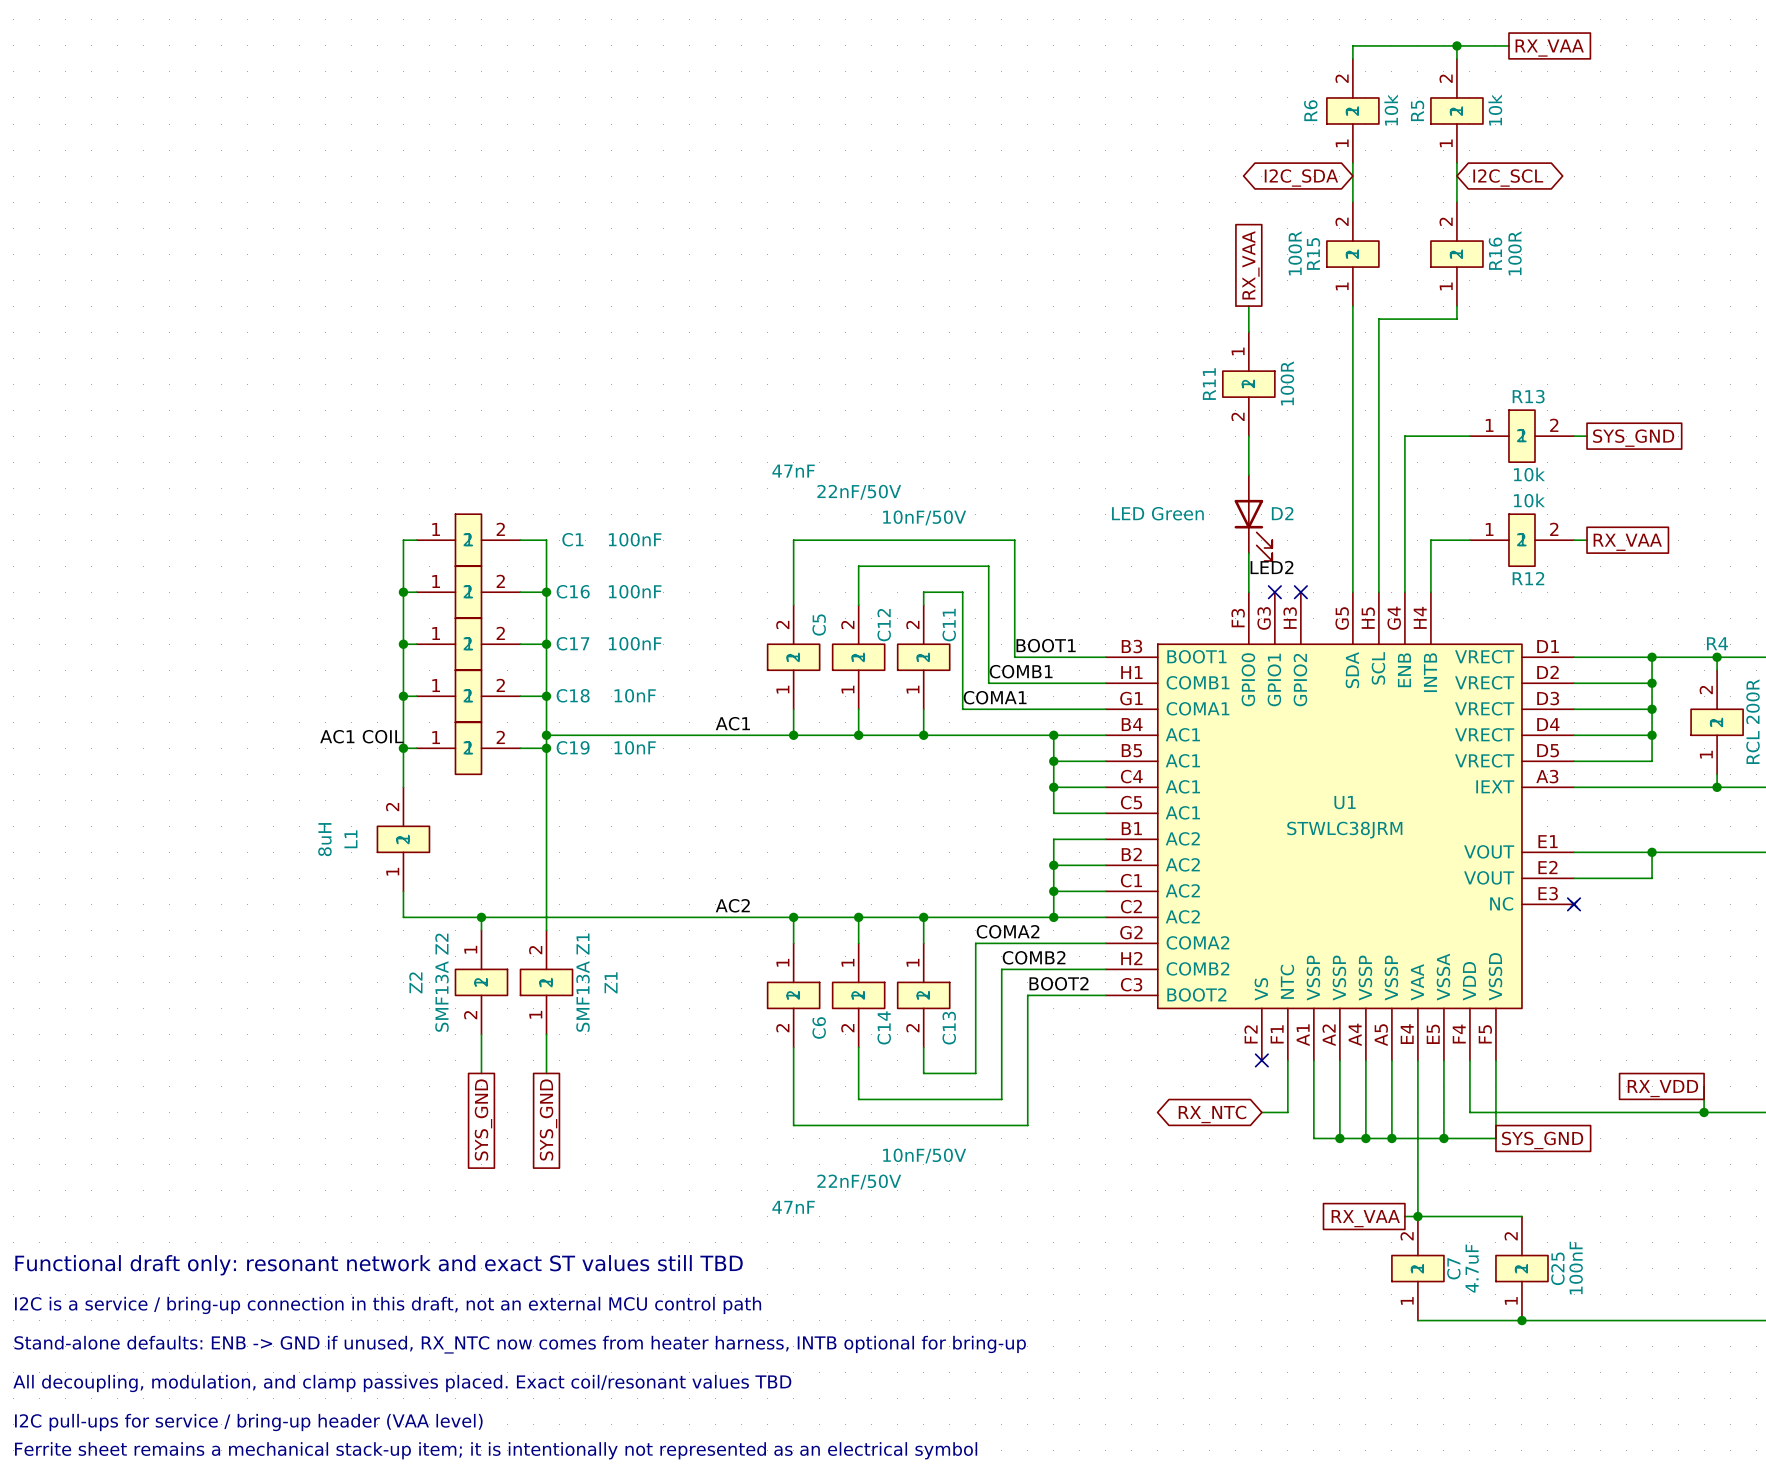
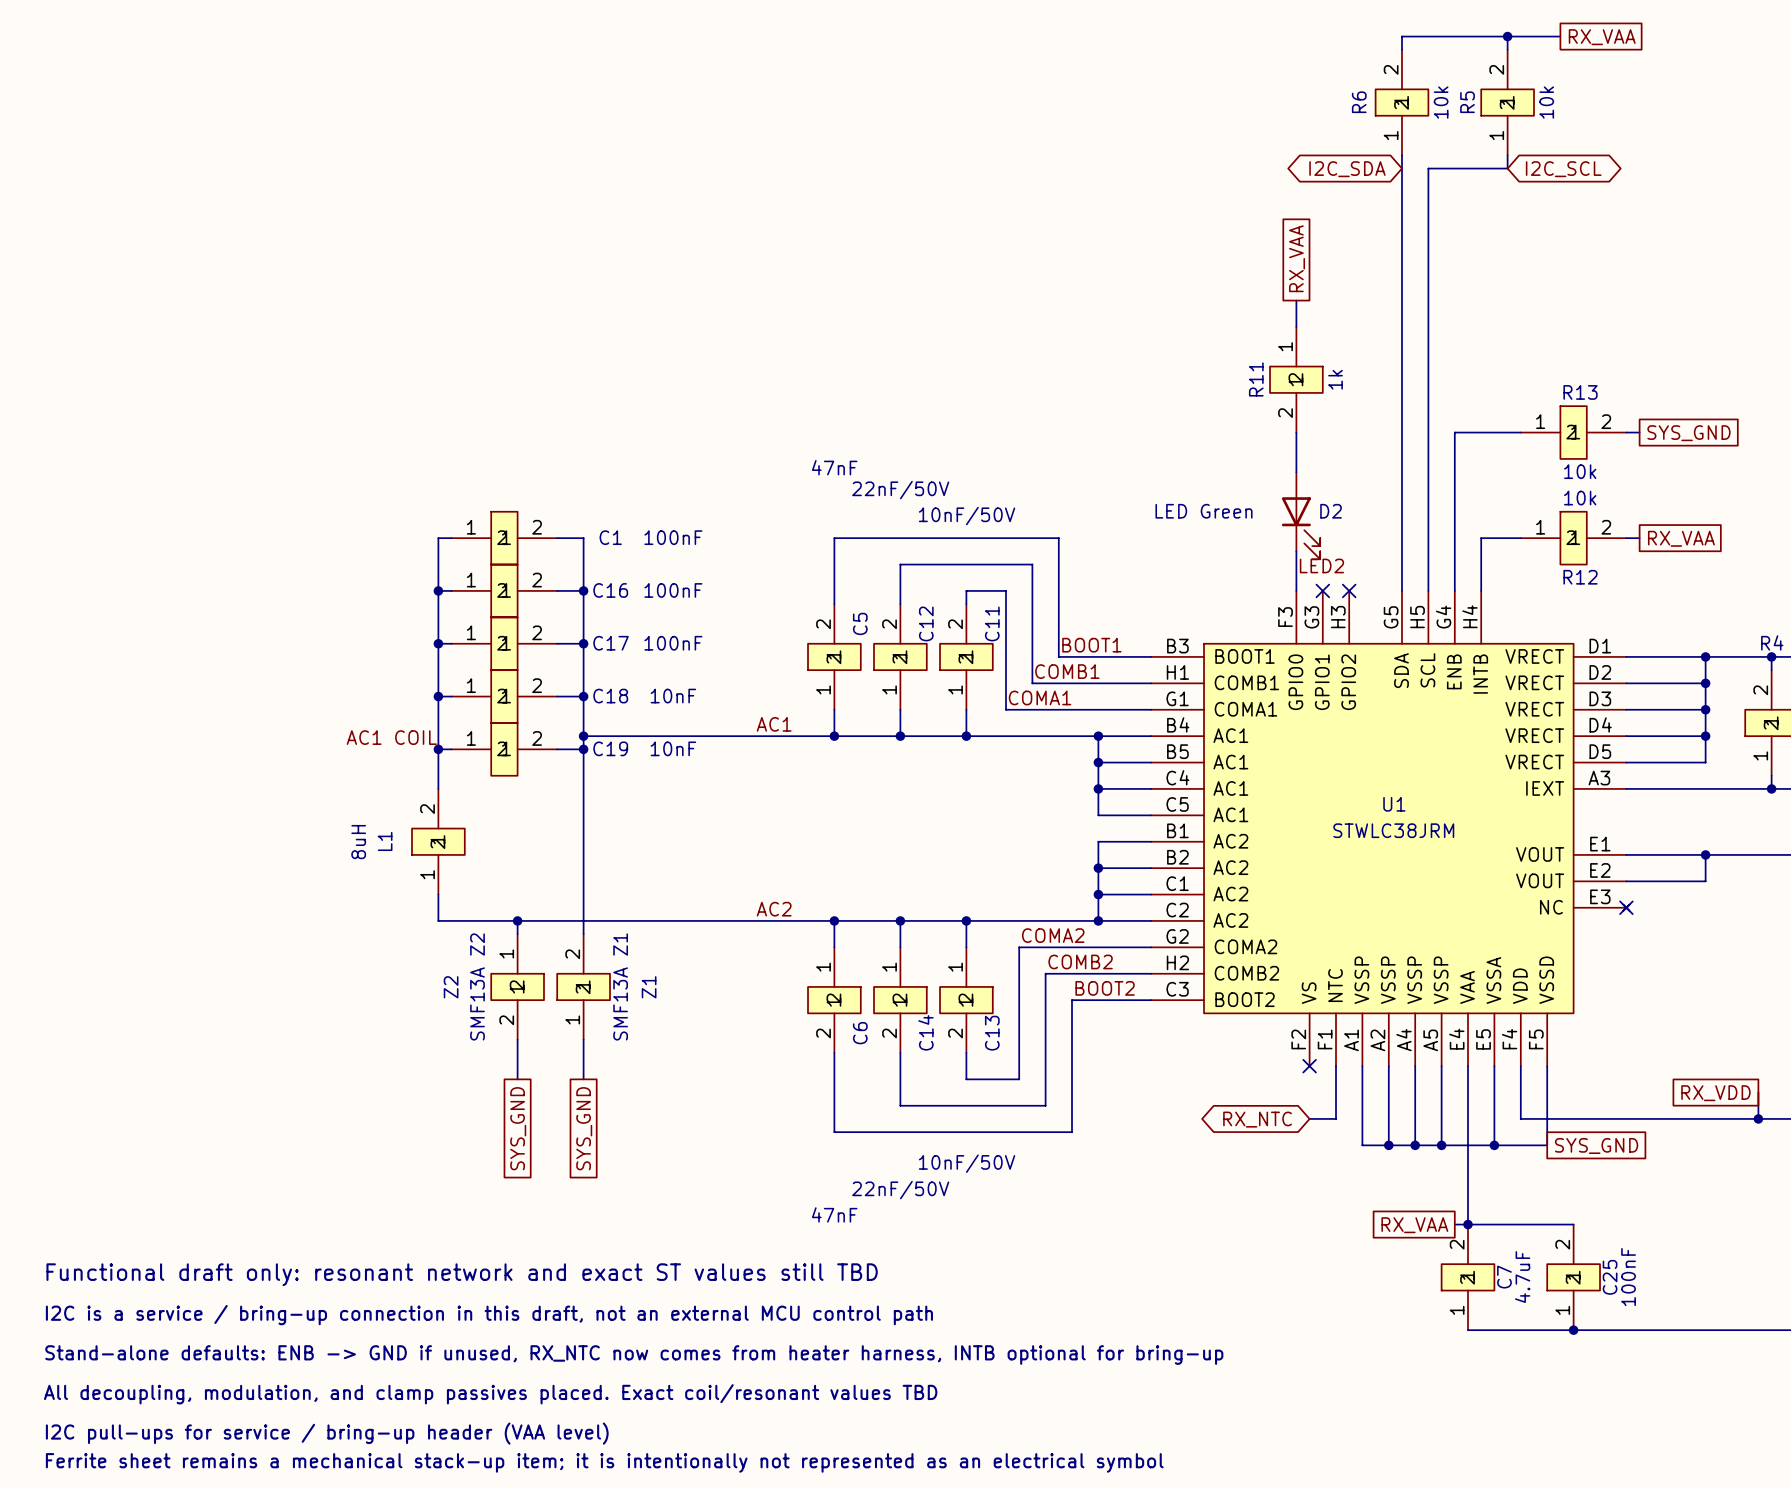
wire: (1456, 176) (1456, 202) -> none
R15: 100R (1352, 254) -> none
R16: 100R (1456, 254) -> none
wire: (1456, 306) (1456, 319) (1378, 319) -> (1507, 168) (1428, 168) (1428, 313)
R11 value: 100R (1287, 383) -> 1k (1335, 379)

